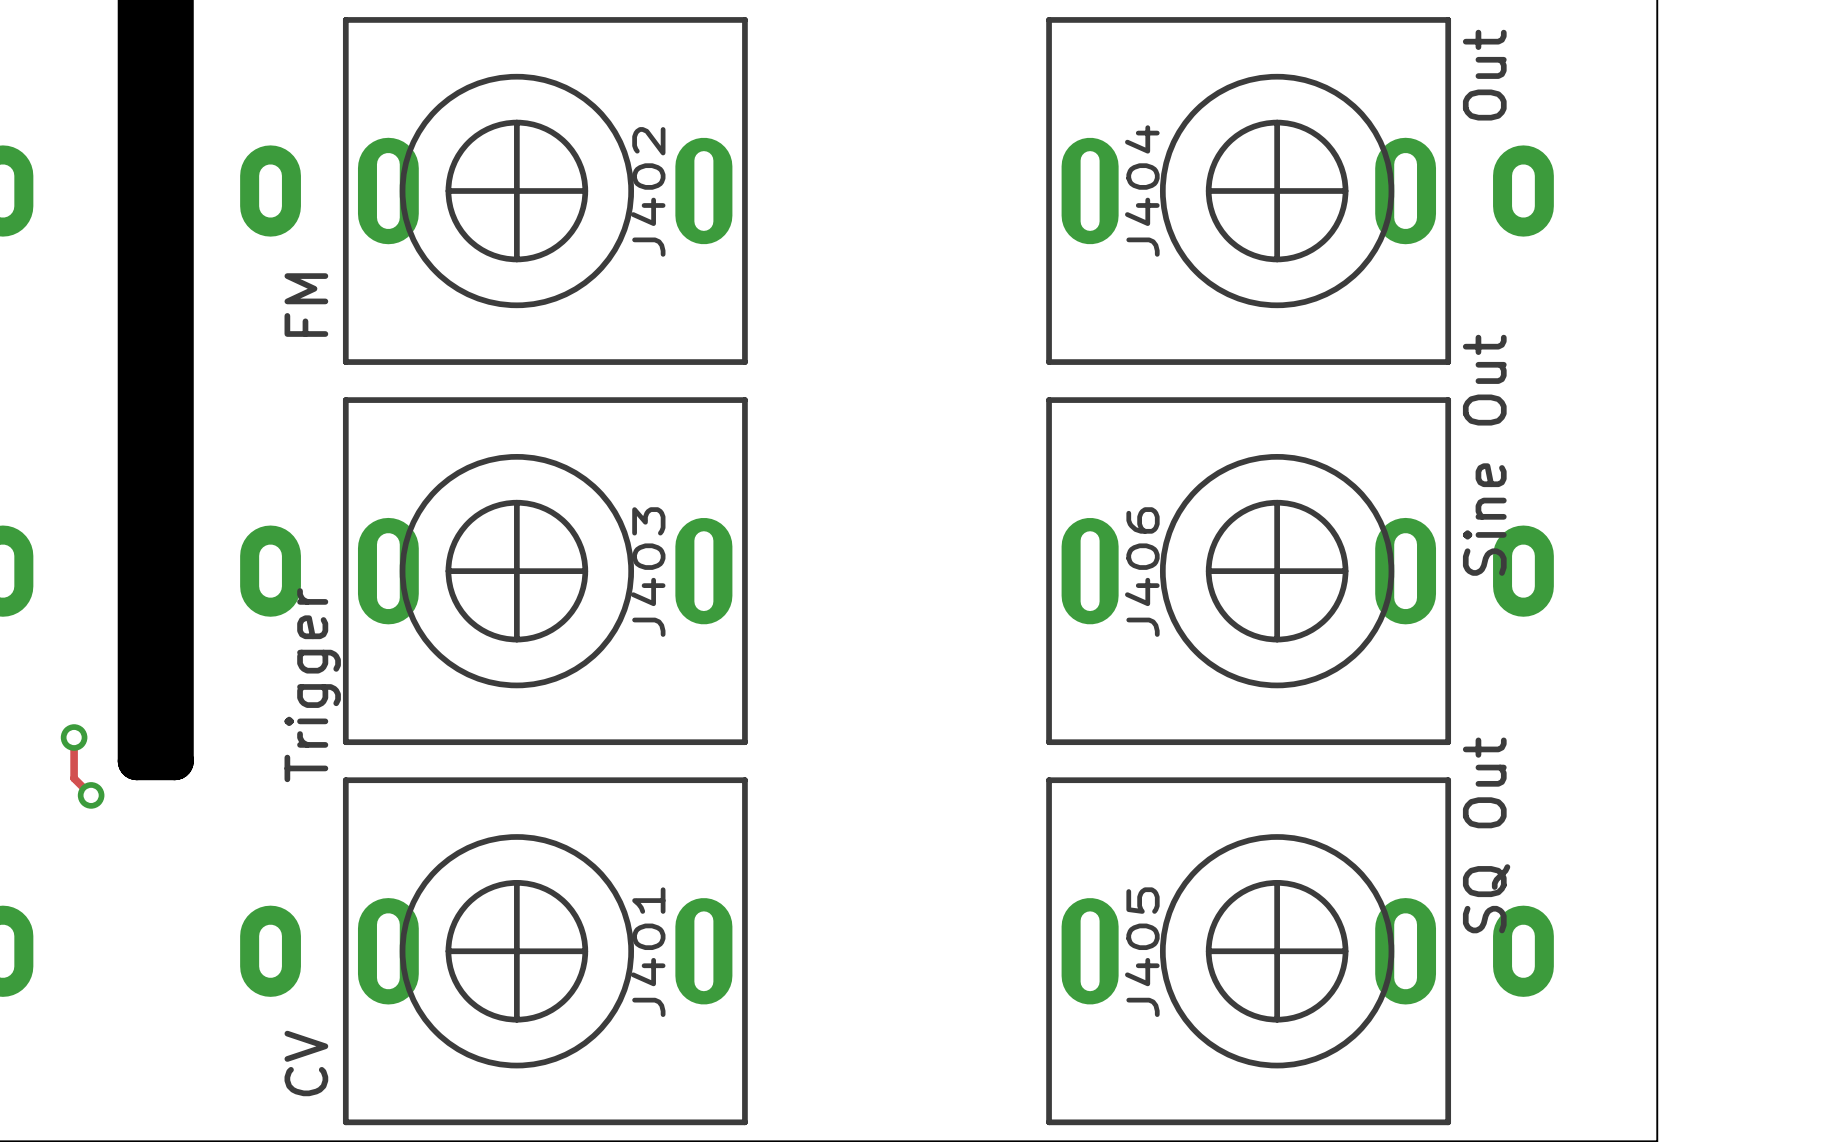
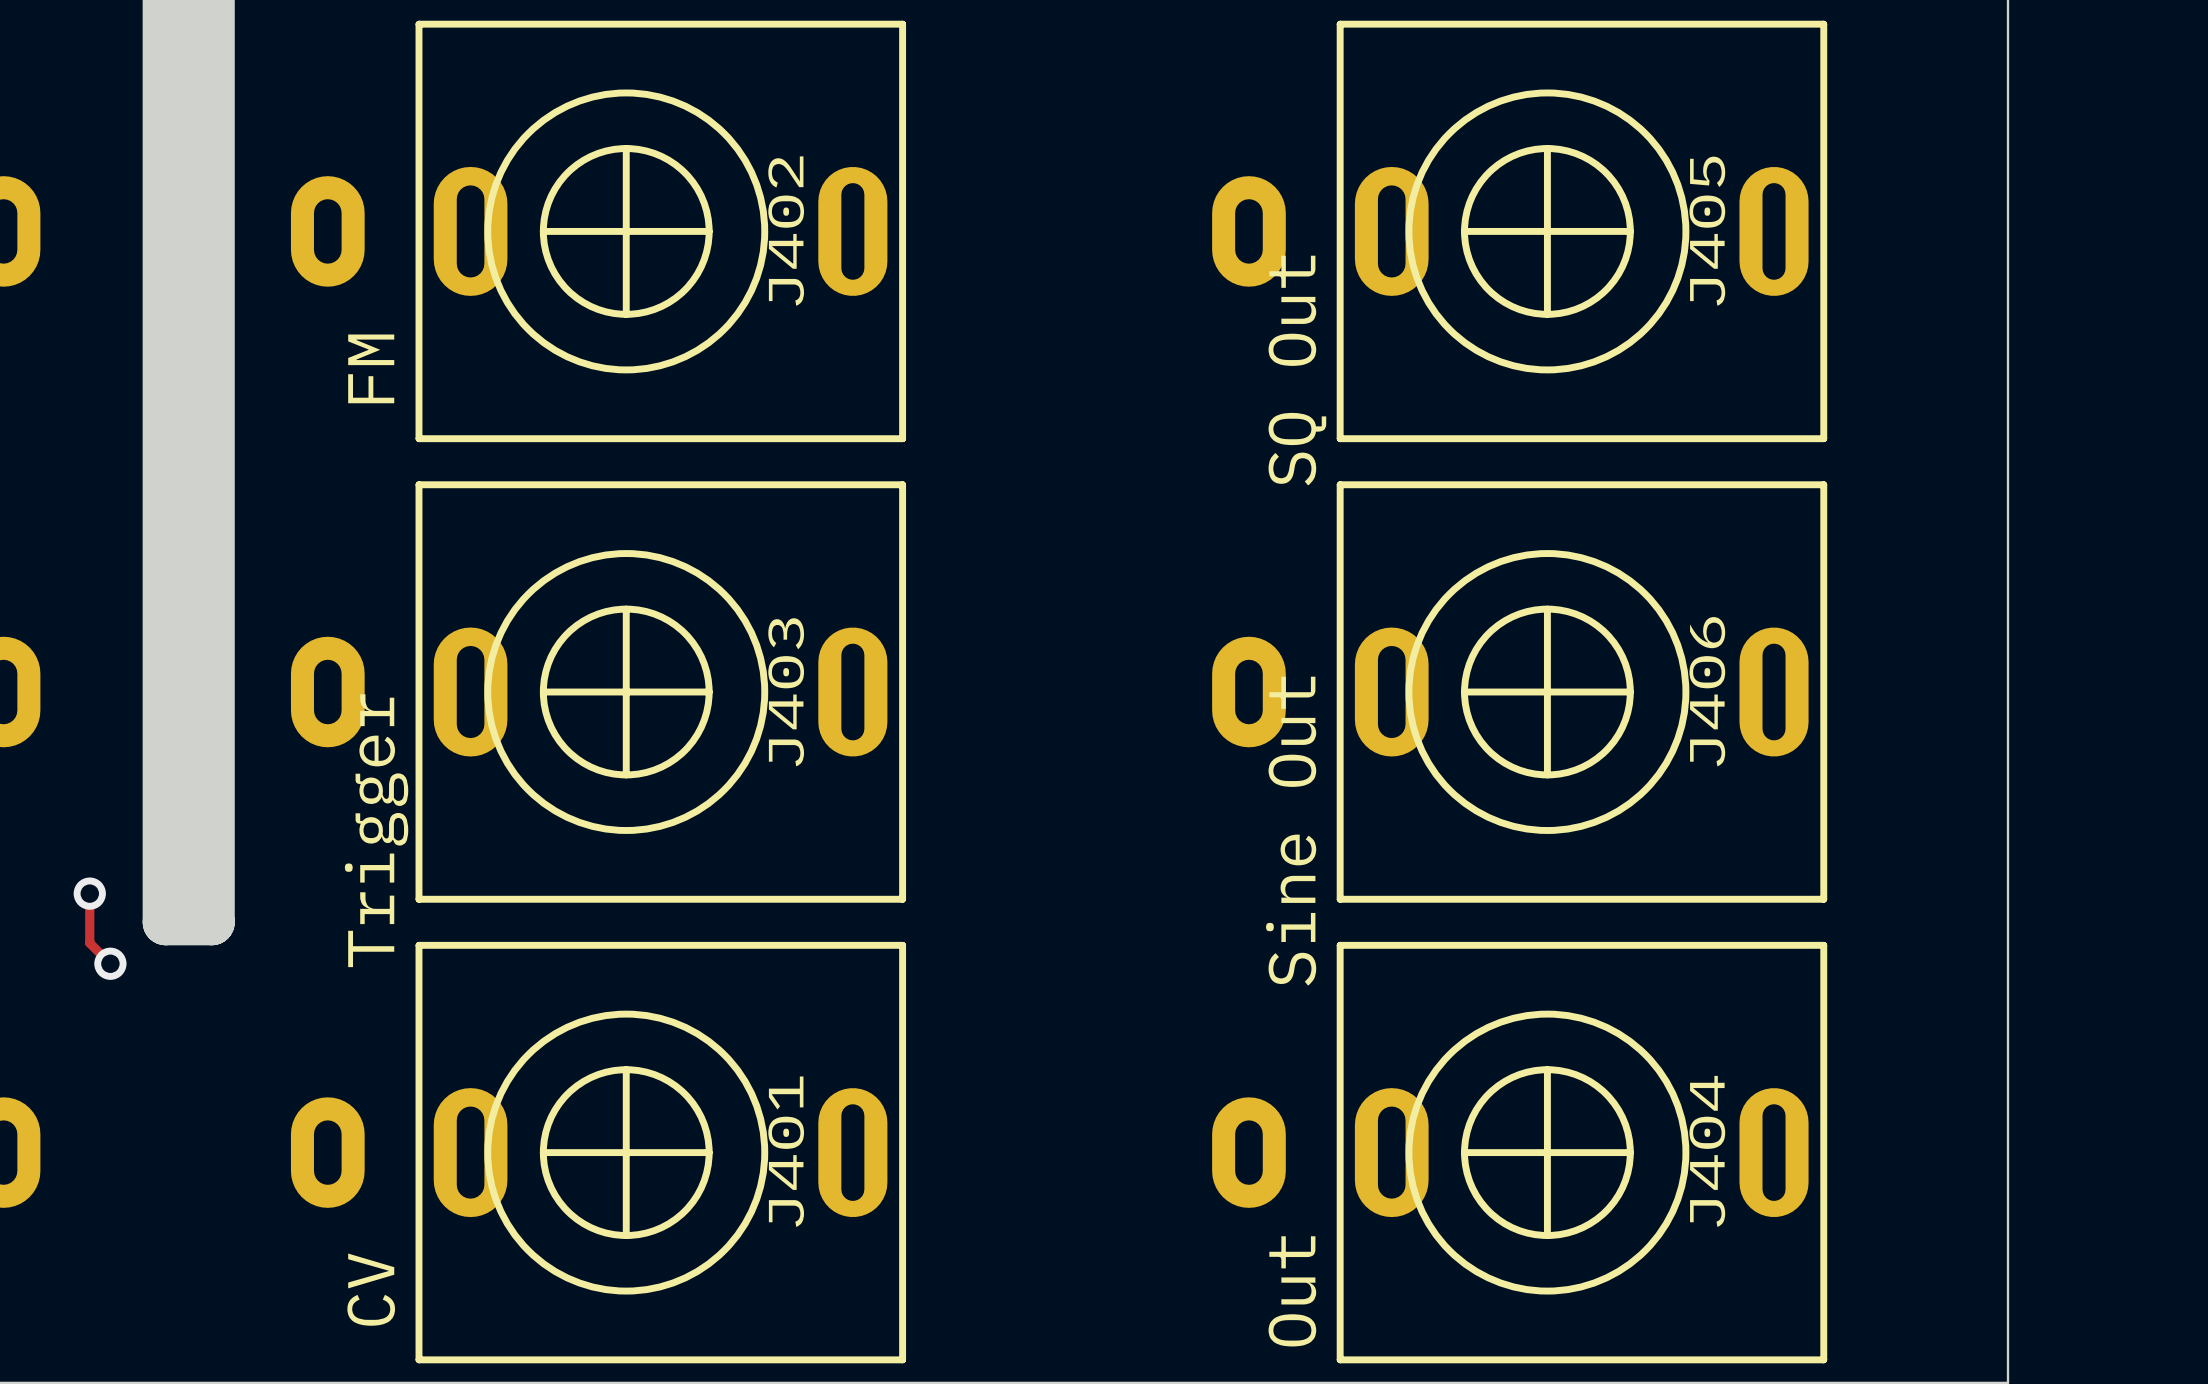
J404 rotation: 0° (1300, 191) -> 180° (1519, 1152)
J404 position: (1300, 191) -> (1519, 1152)
J406 rotation: 0° (1300, 571) -> 180° (1519, 692)
J405 rotation: 0° (1300, 951) -> 180° (1519, 231)
J405 position: (1300, 951) -> (1519, 231)

